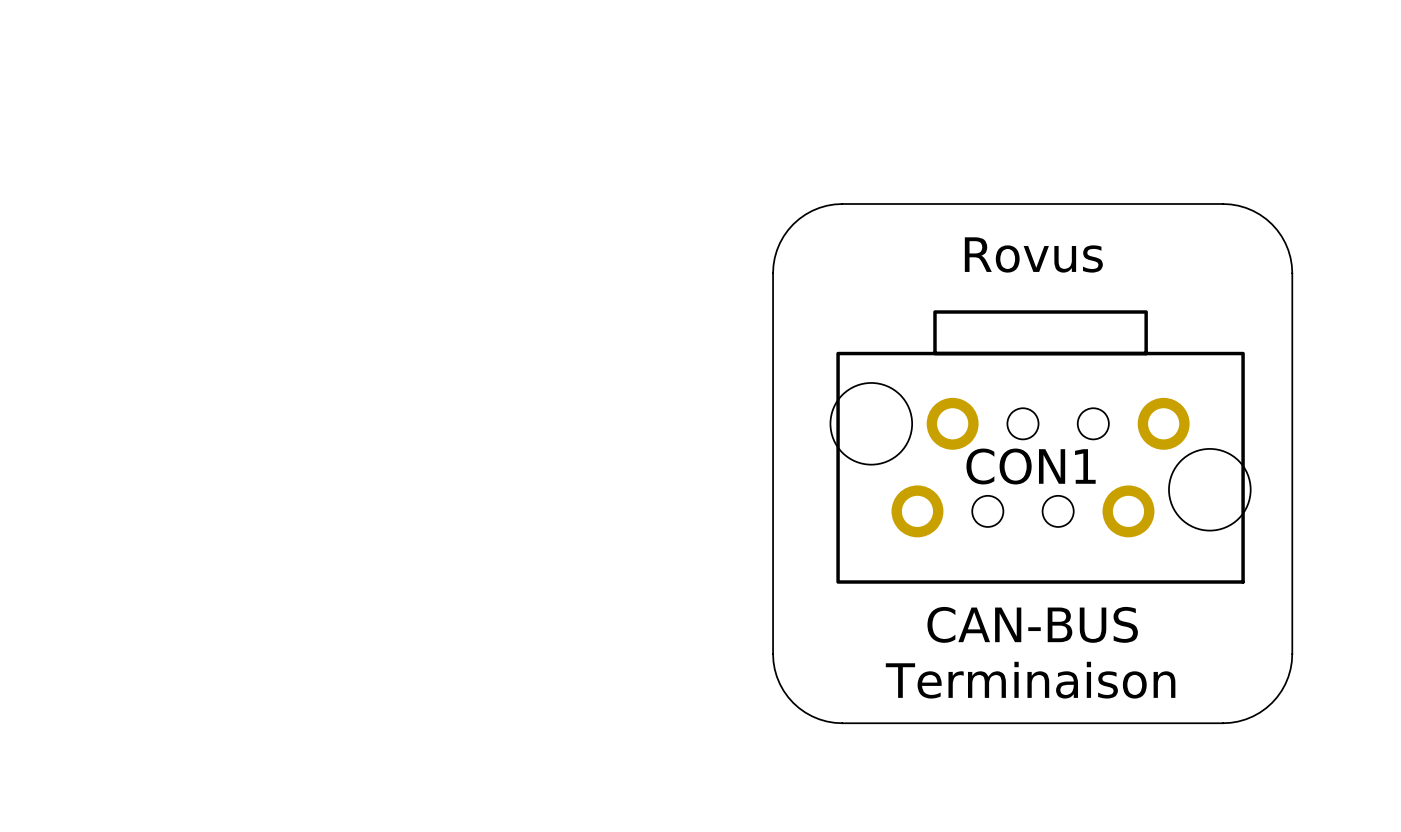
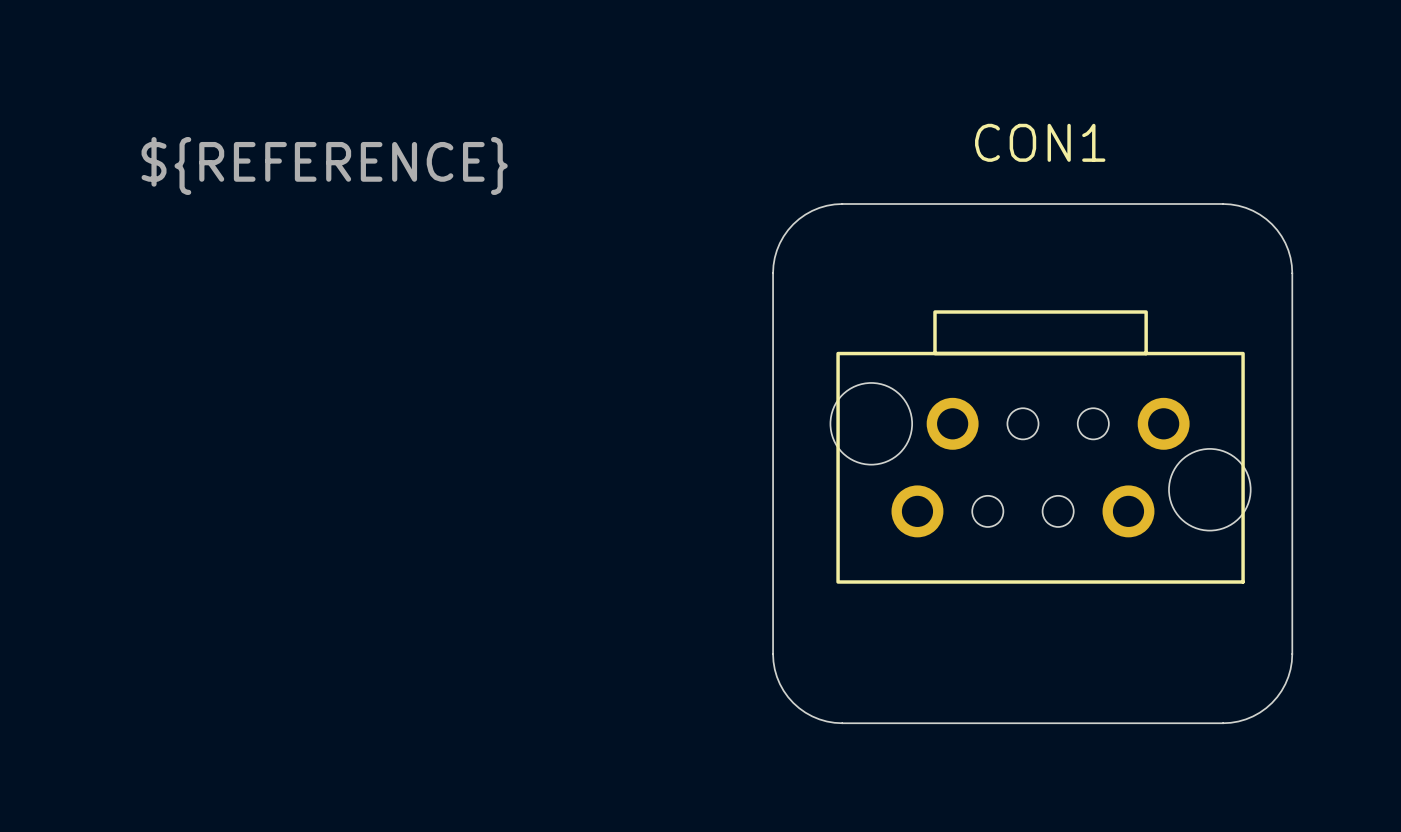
text: none -> ${REFERENCE} (324, 165)
text: Rovus (1033, 254) -> none
CON1 name position: CON1 (1031, 466) -> CON1 (1040, 142)
text: CAN-BUS (1032, 624) -> none
text: Terminaison (1030, 680) -> none

